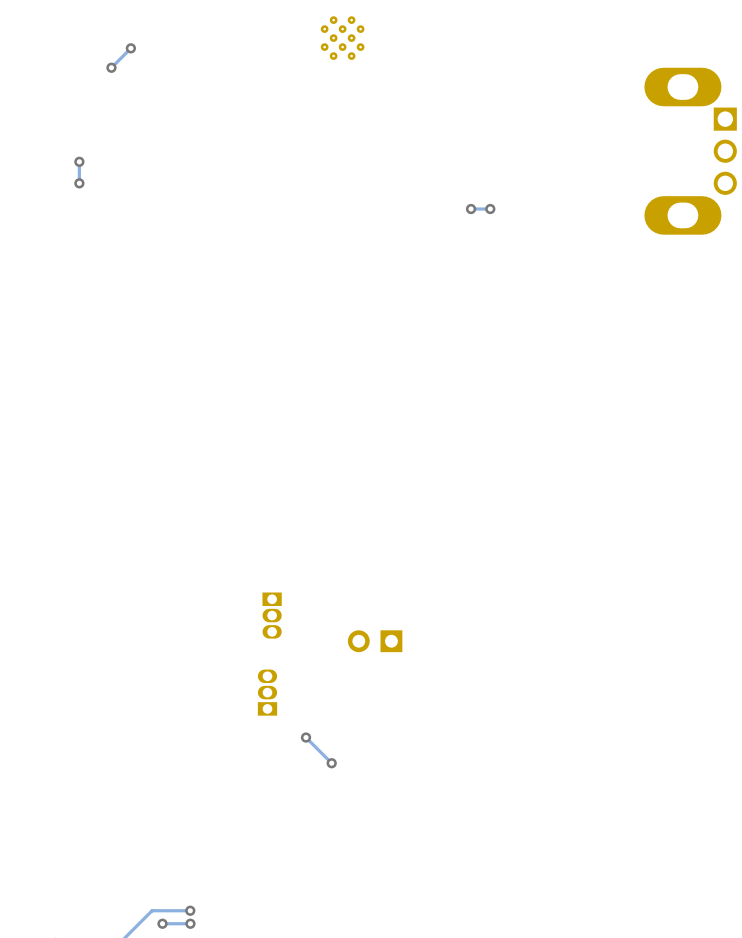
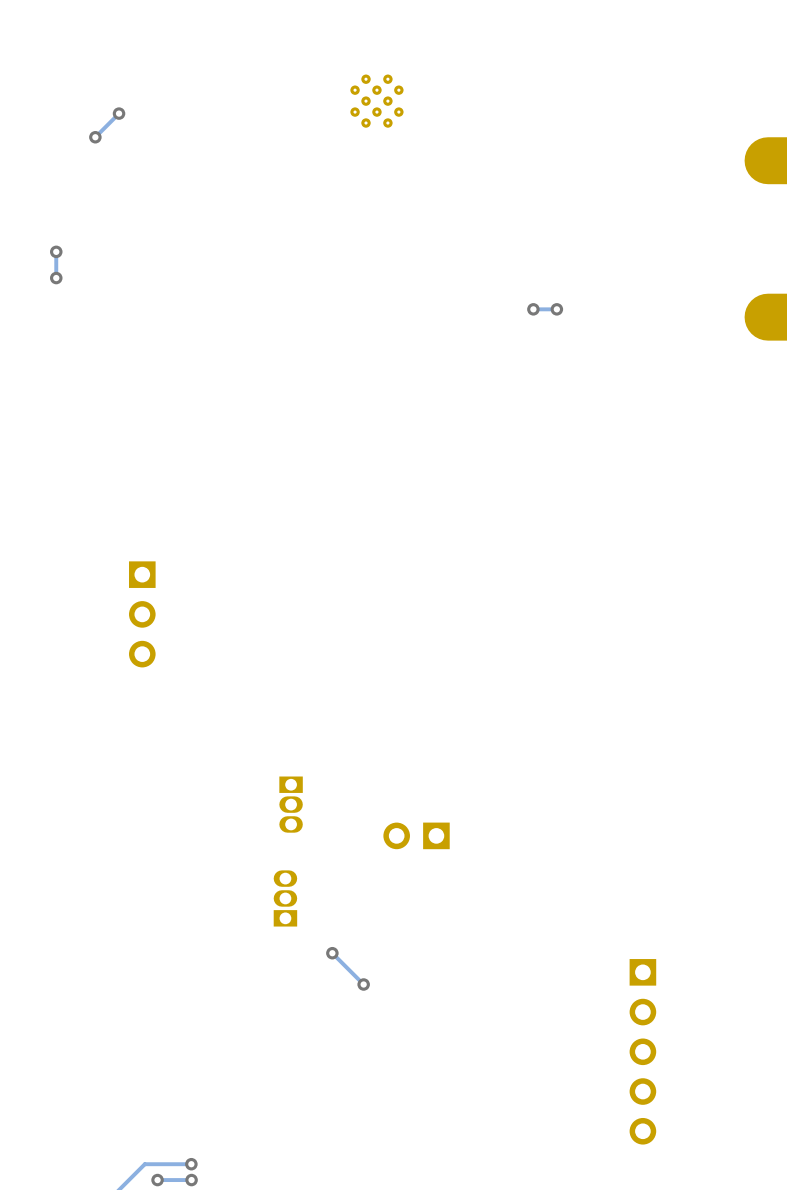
part: none -> (142, 614)
part: none -> (642, 1051)

